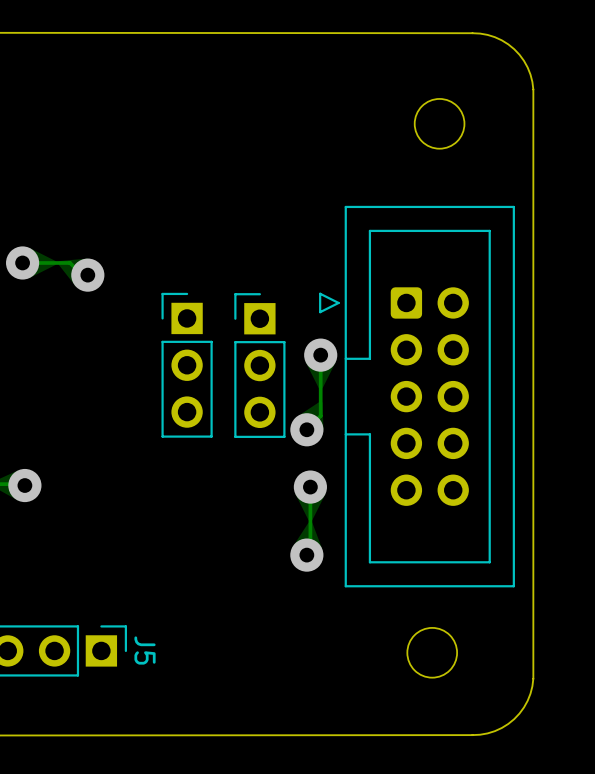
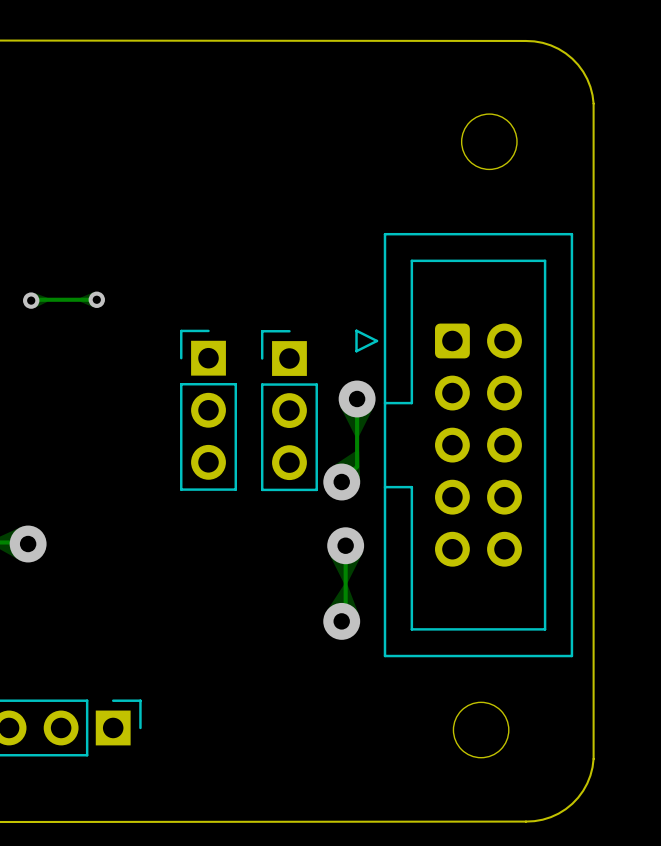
via size: [6, 246, 40, 280] -> [23, 292, 40, 309]
via size: [71, 258, 105, 292] -> [88, 291, 106, 308]
track: (22, 262) (70, 262) (82, 275) (87, 275) -> none
track: none -> (96, 299) (31, 300)
J5 name: J5 (145, 650) -> none

